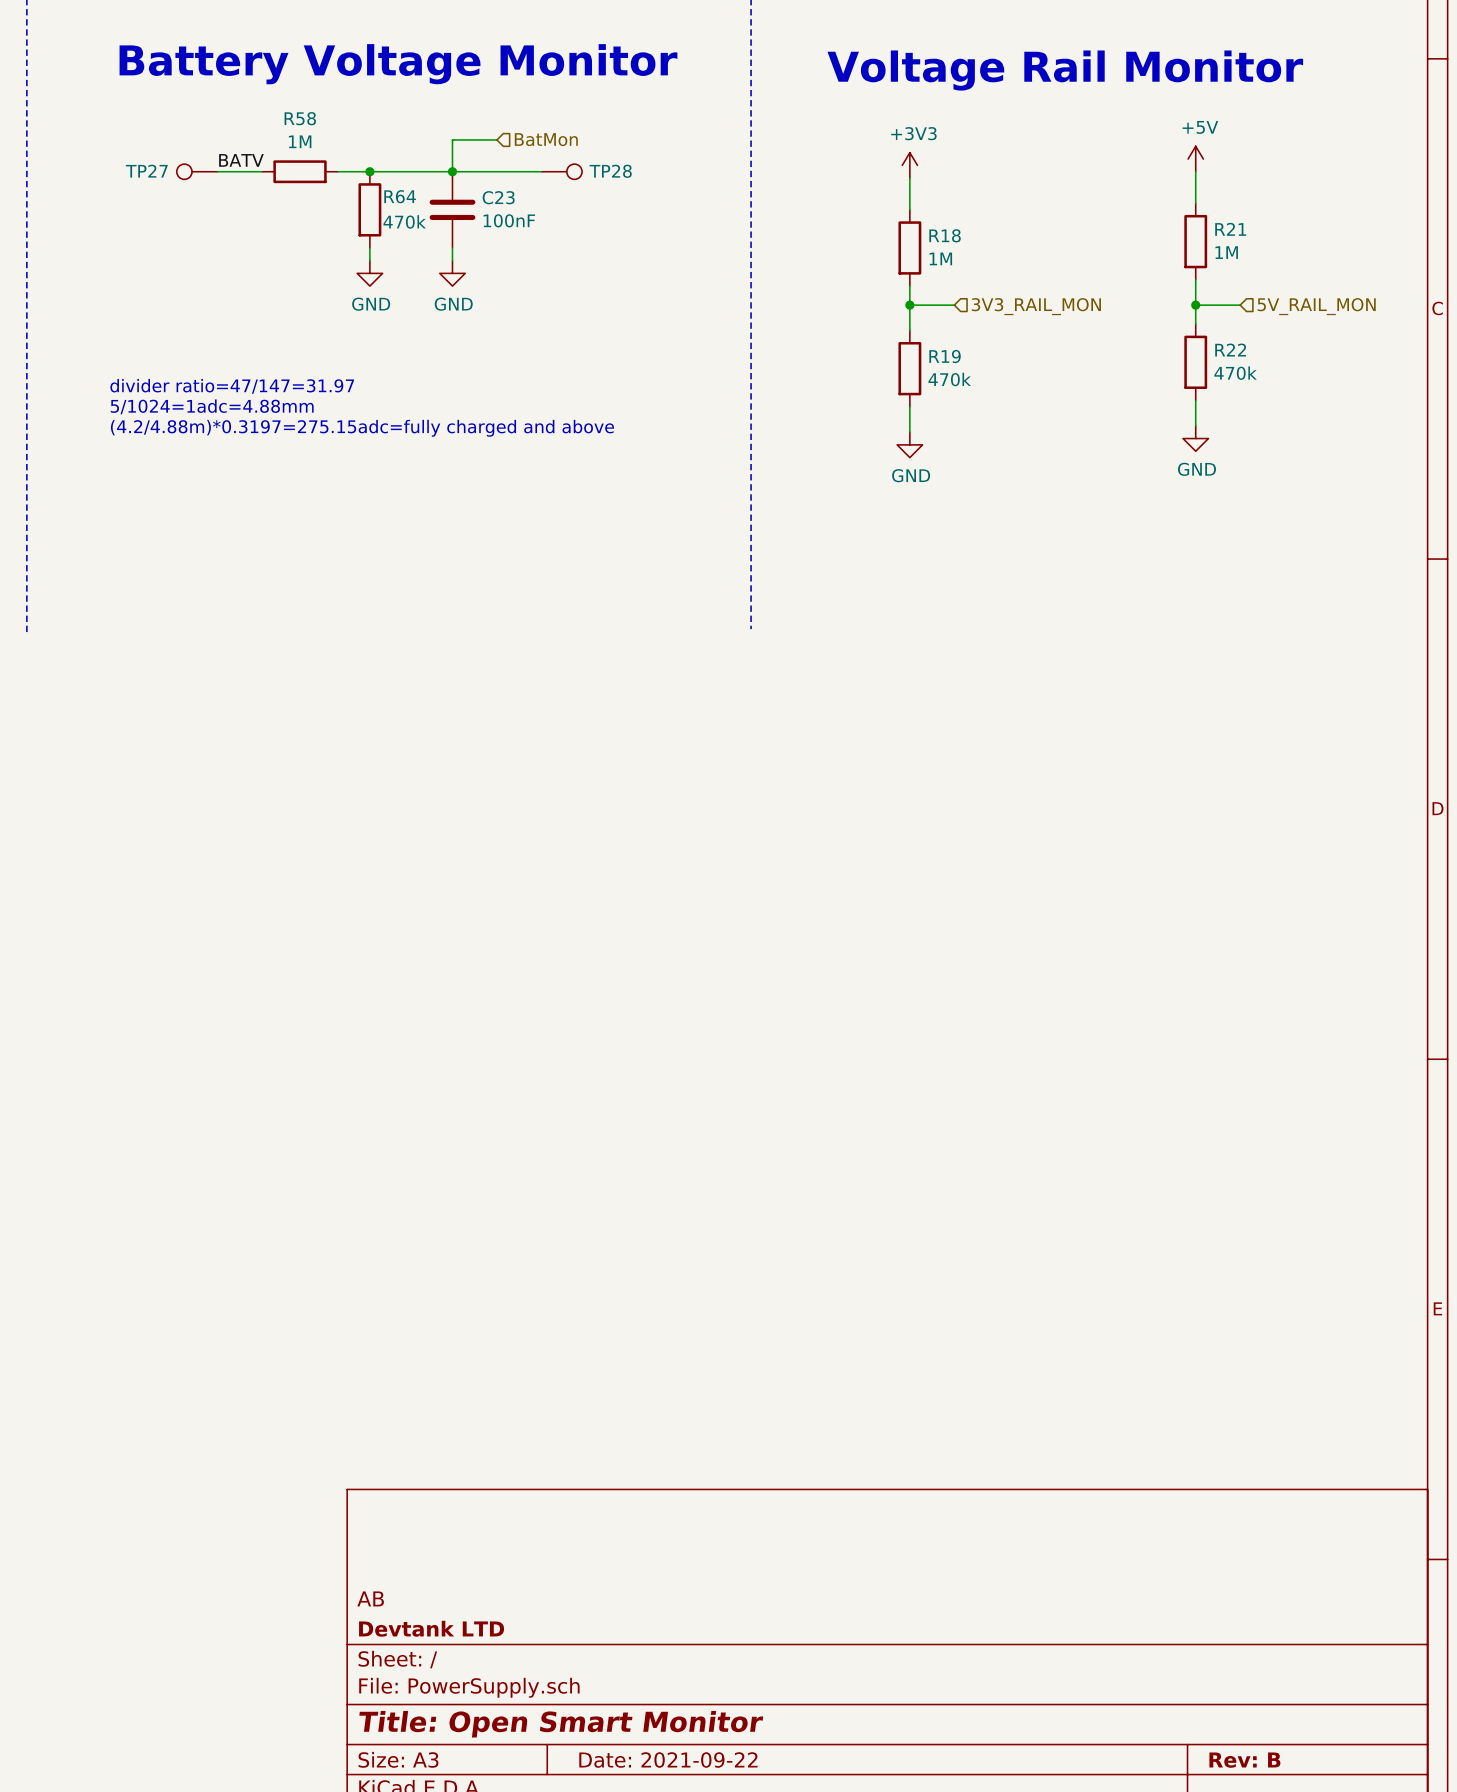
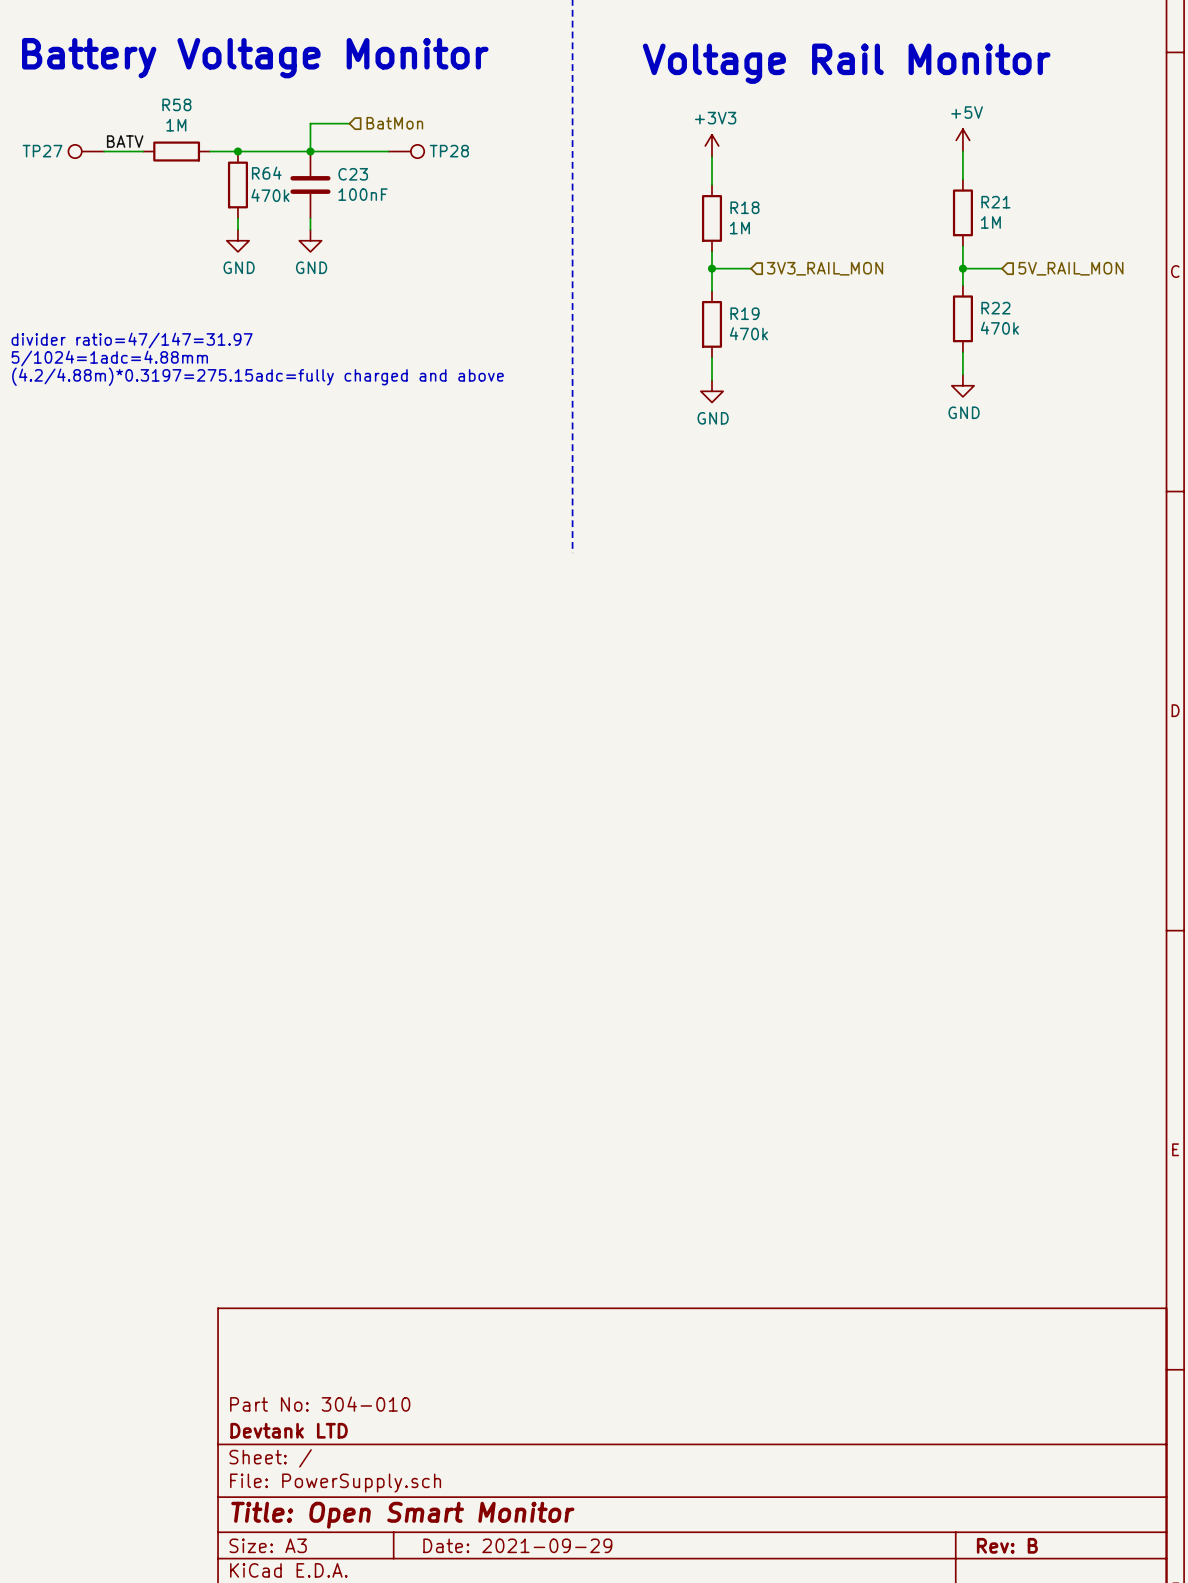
title block: AB (370, 1598) -> Part No: 304-010 (320, 1404)
title block: Date: 2021-09-22 (668, 1760) -> Date: 2021-09-29 (517, 1545)

